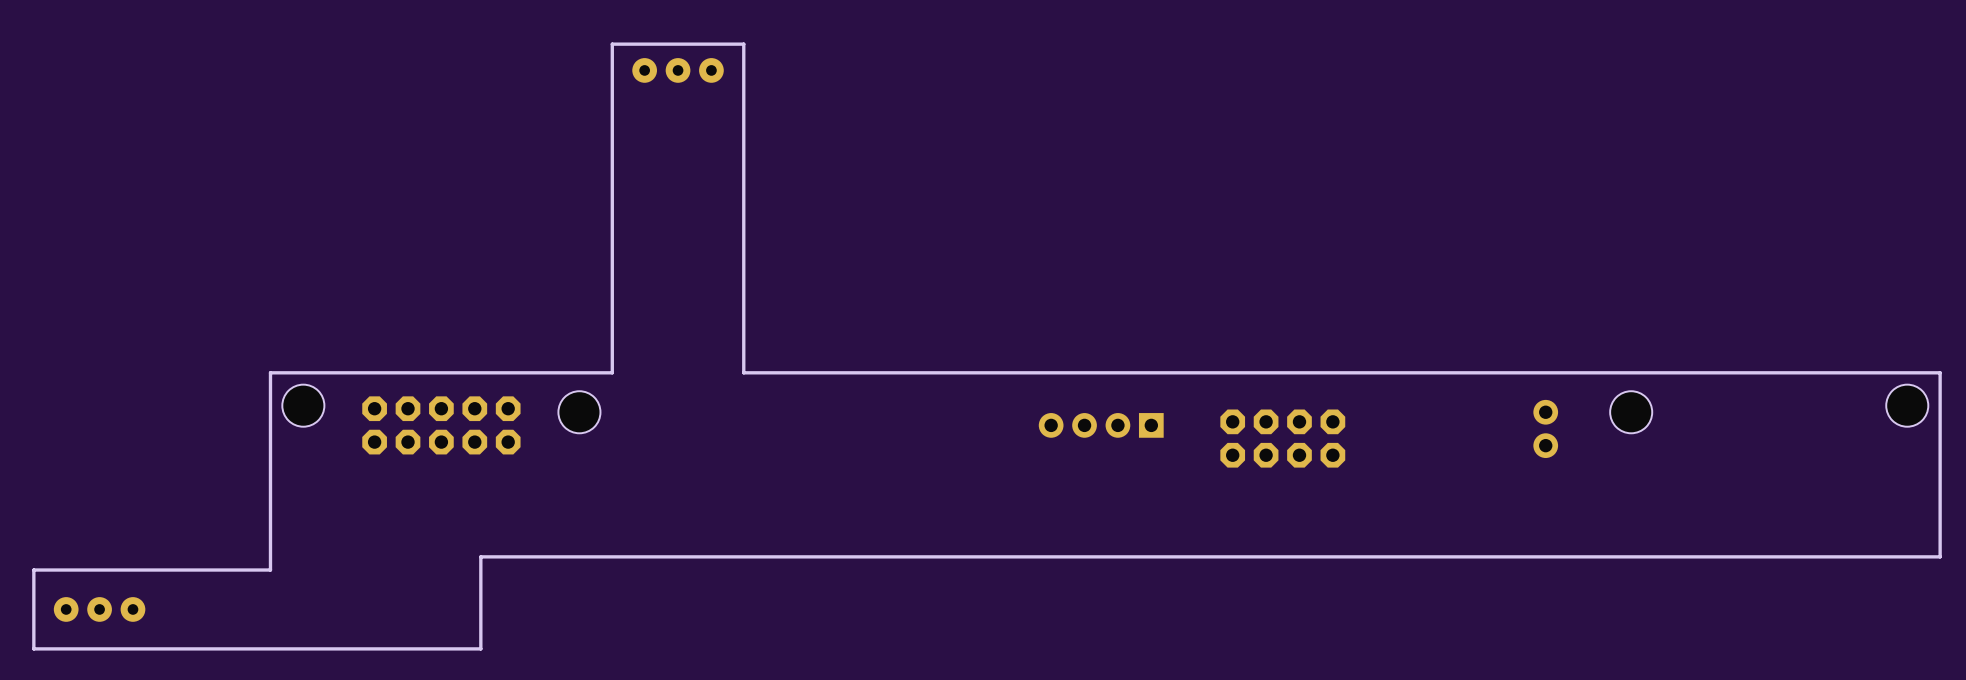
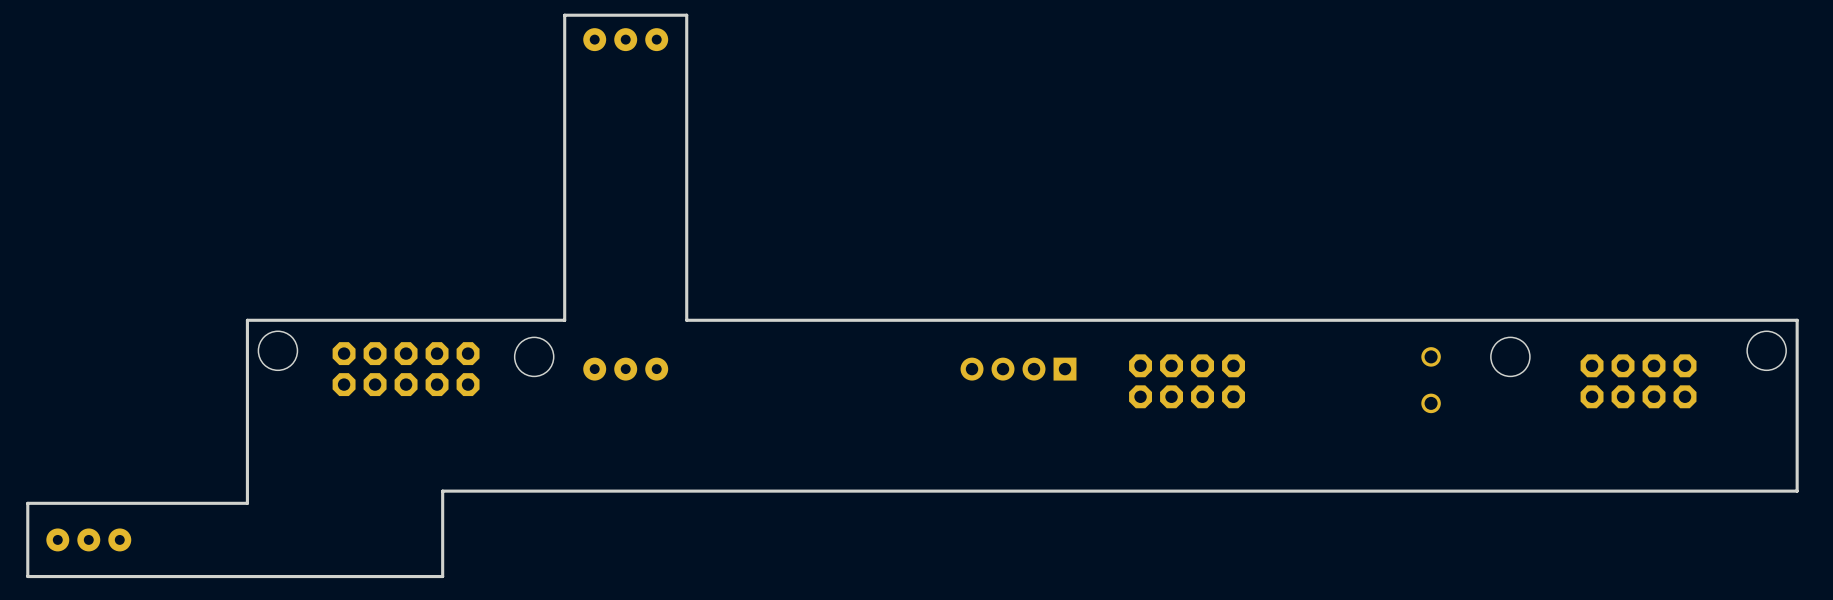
part footprint: [1533, 399, 1559, 459] -> [1421, 347, 1441, 414]
part: none -> (625, 369)
part: none -> (1638, 381)

